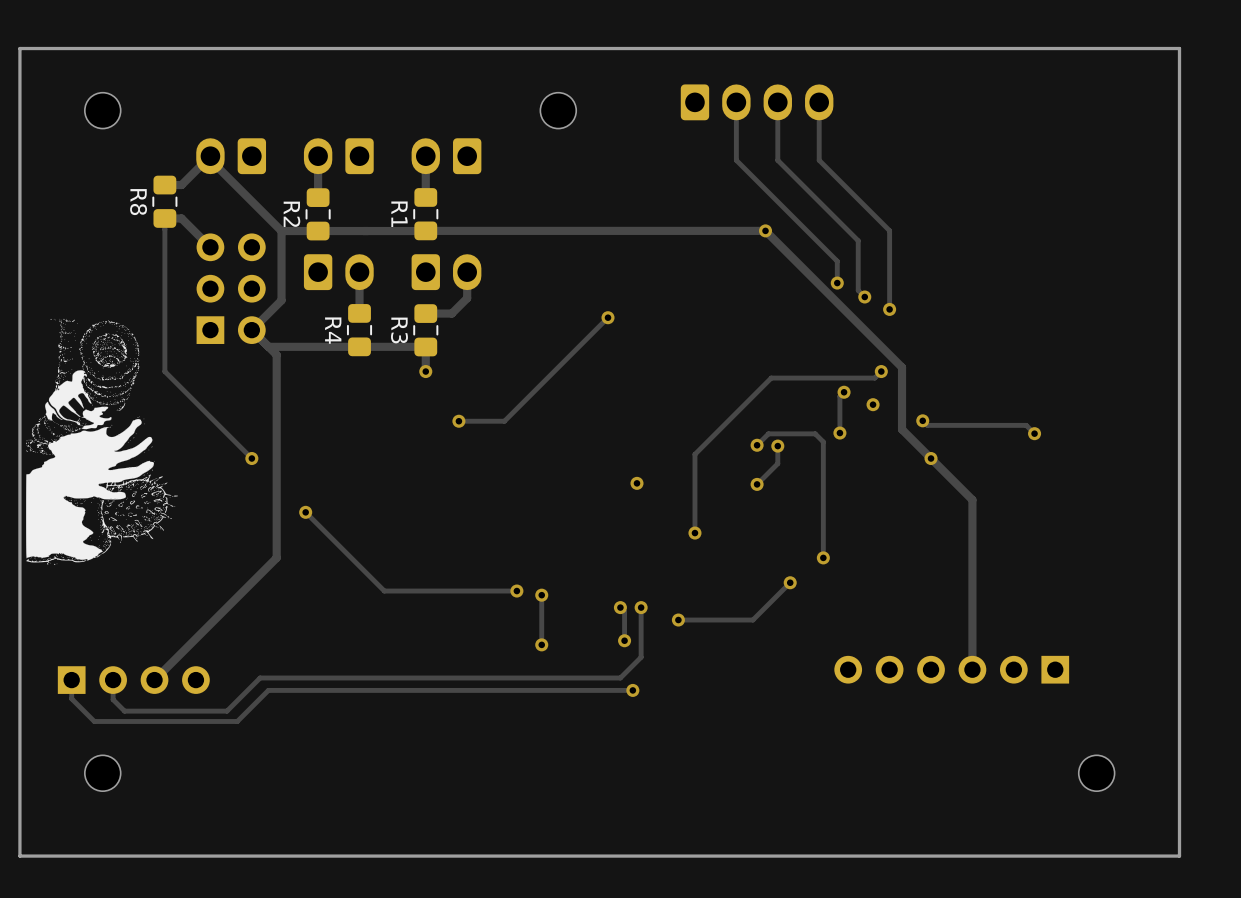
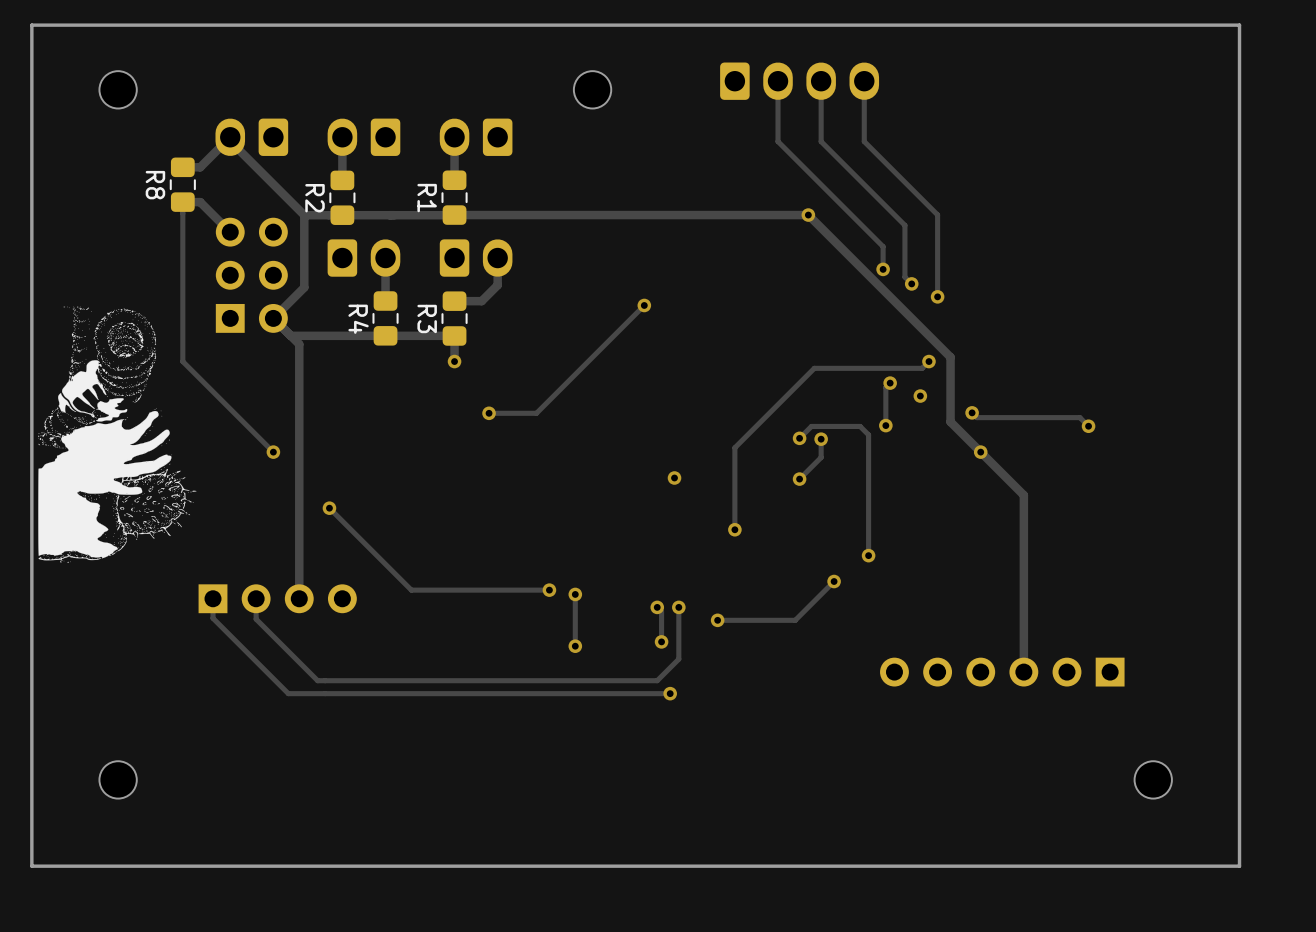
track: (276, 557) (154, 680) -> (299, 555) (299, 598)
track: (294, 678) (260, 678) (227, 711) (124, 711) (113, 699) (113, 680) -> (317, 680) (256, 619) (256, 598)
track: (71, 680) (71, 698) (94, 721) (237, 721) (268, 690) -> (213, 598) (213, 618) (288, 693) (290, 693)
part position: (133, 680) -> (277, 598)

